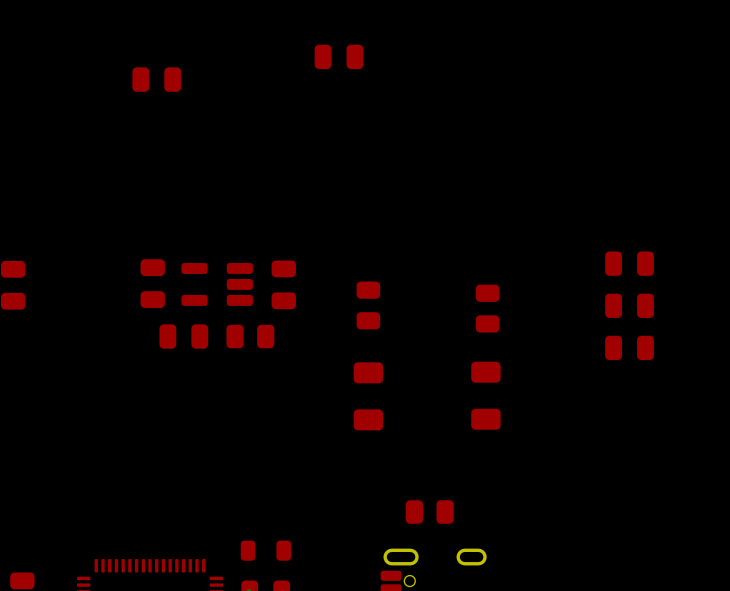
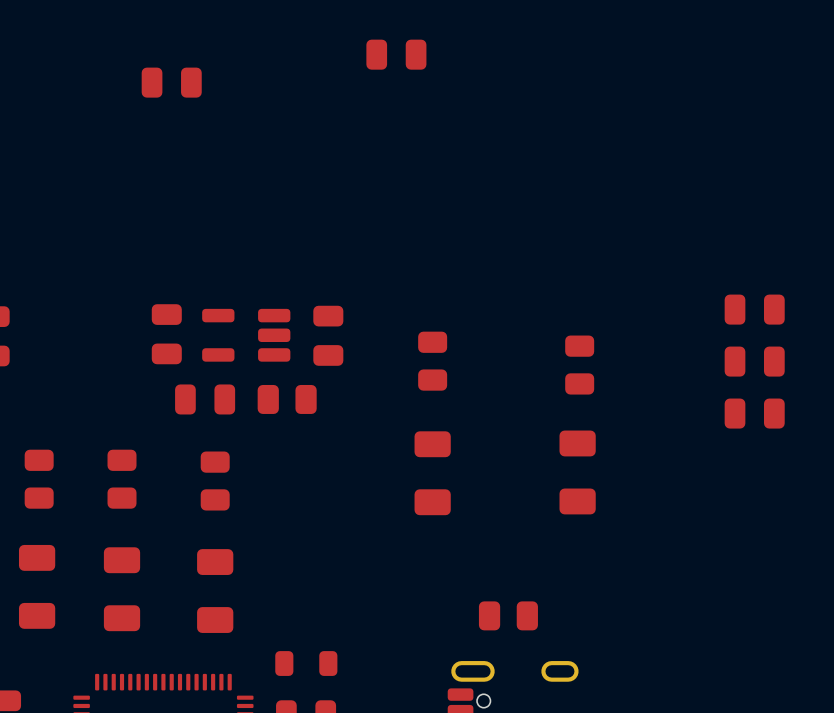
part: none -> (39, 479)
part: none -> (122, 479)
part: none -> (215, 481)
part: none -> (37, 586)
part: none -> (122, 589)
part: none -> (215, 591)

